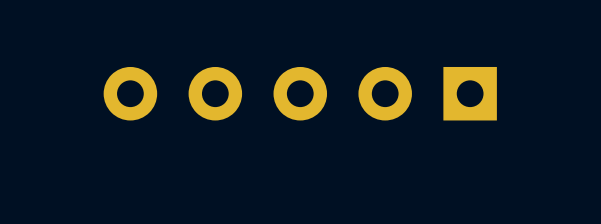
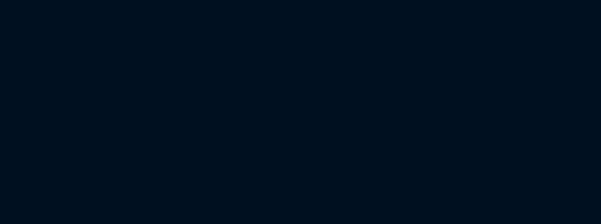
part: (300, 93) -> none

